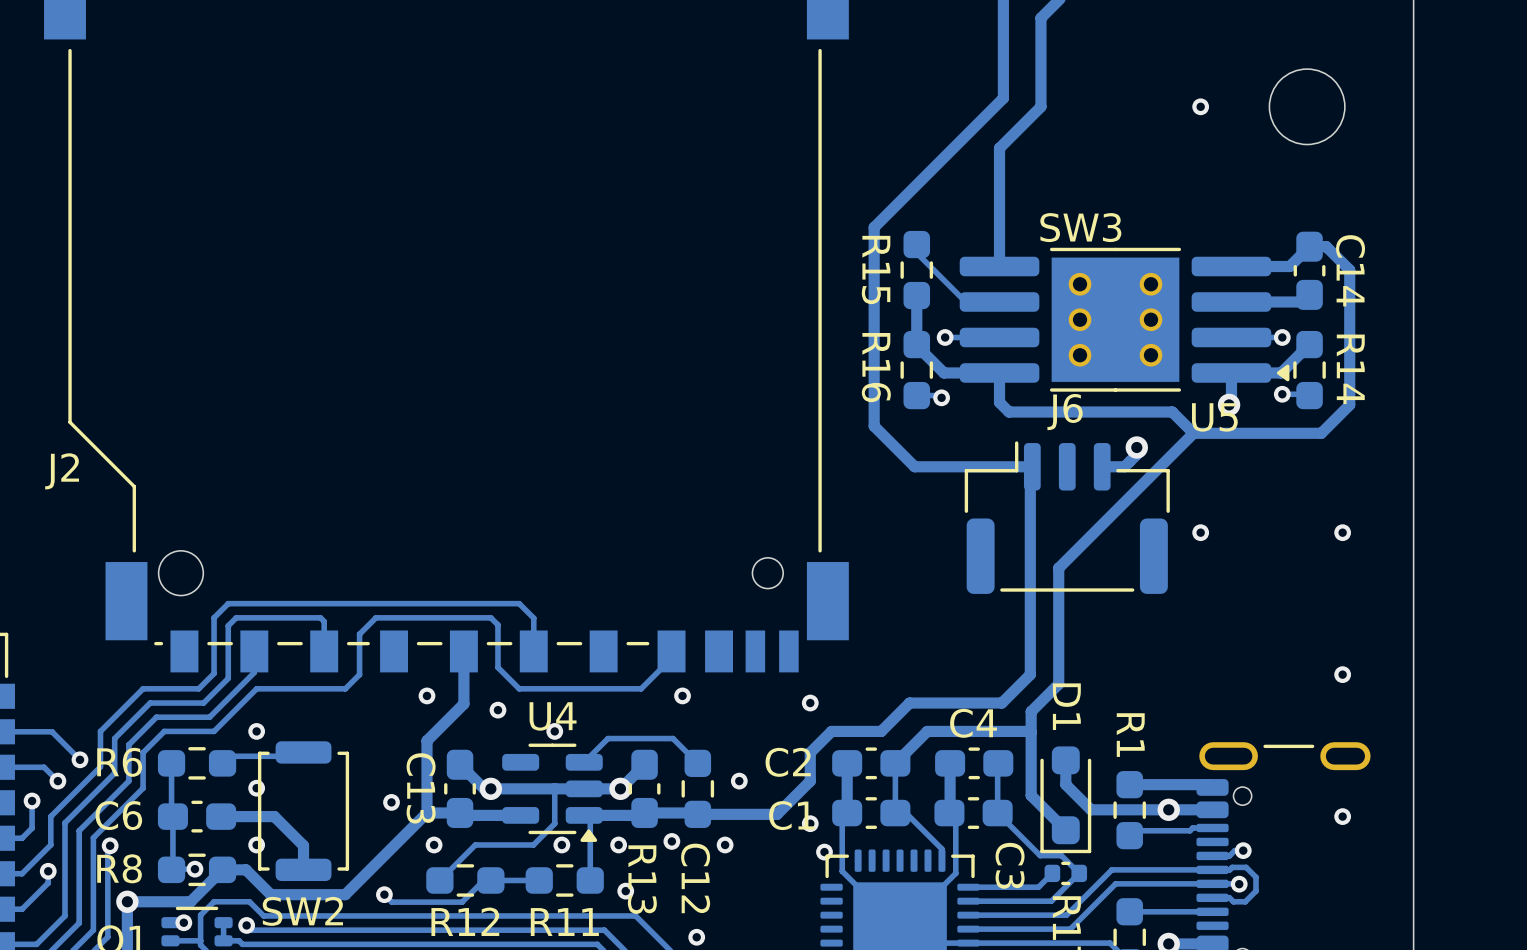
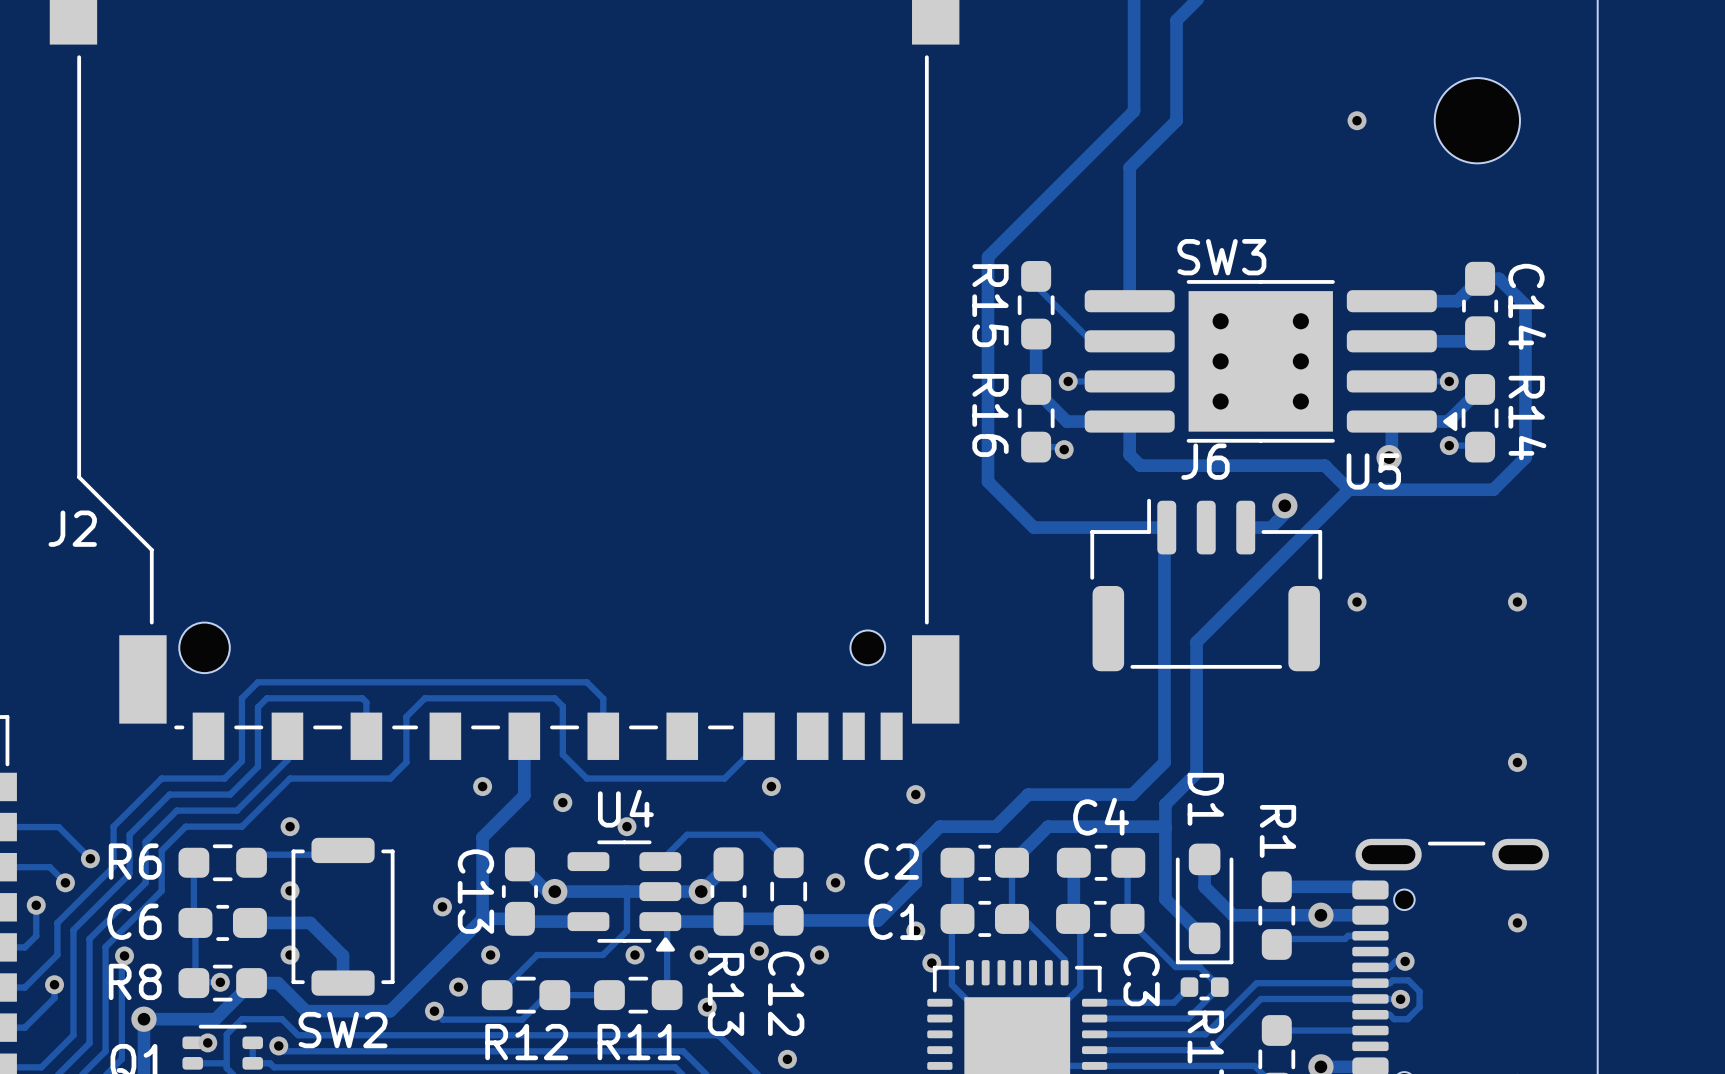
via: none -> (458, 987)

